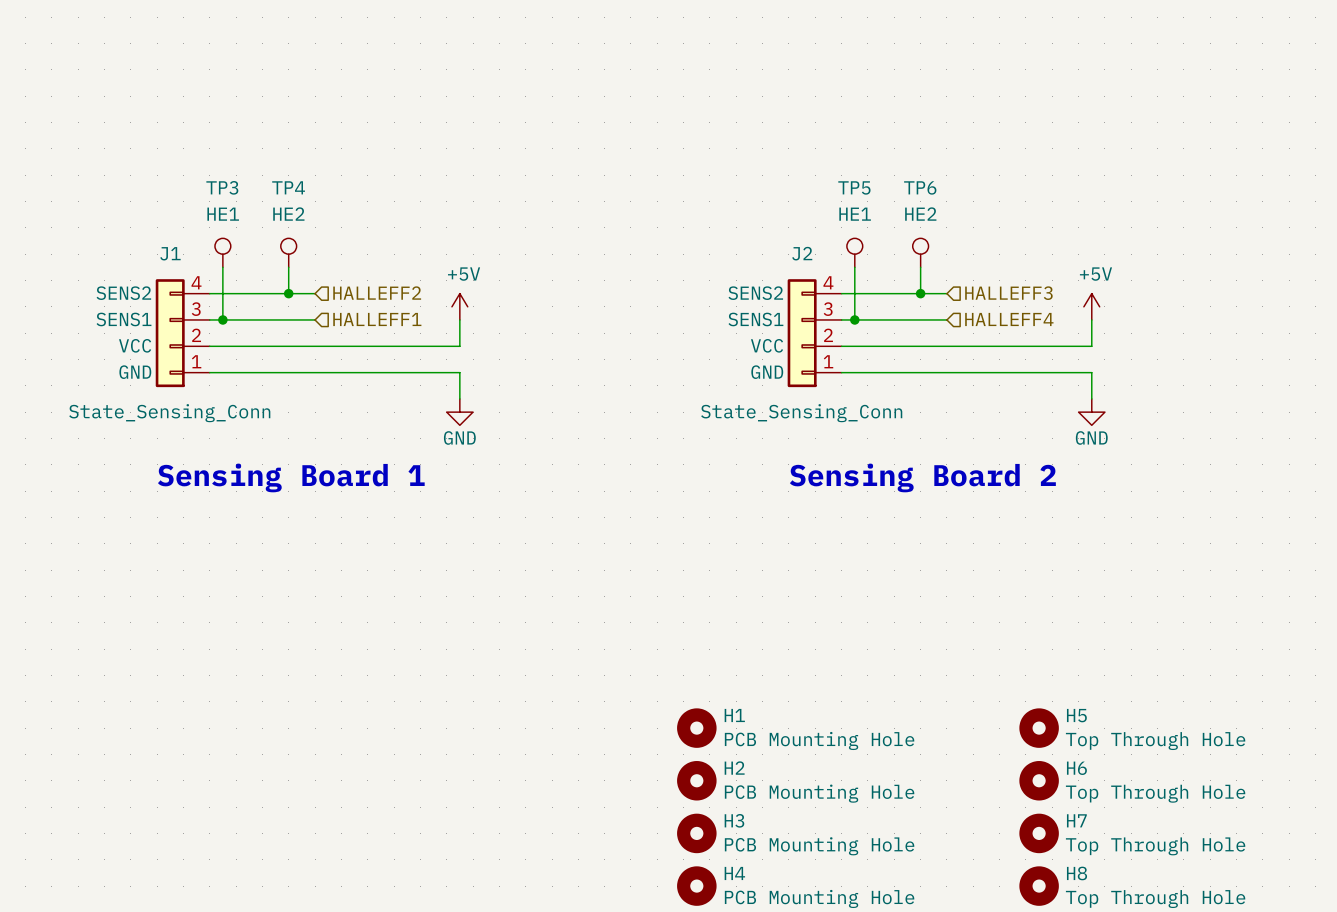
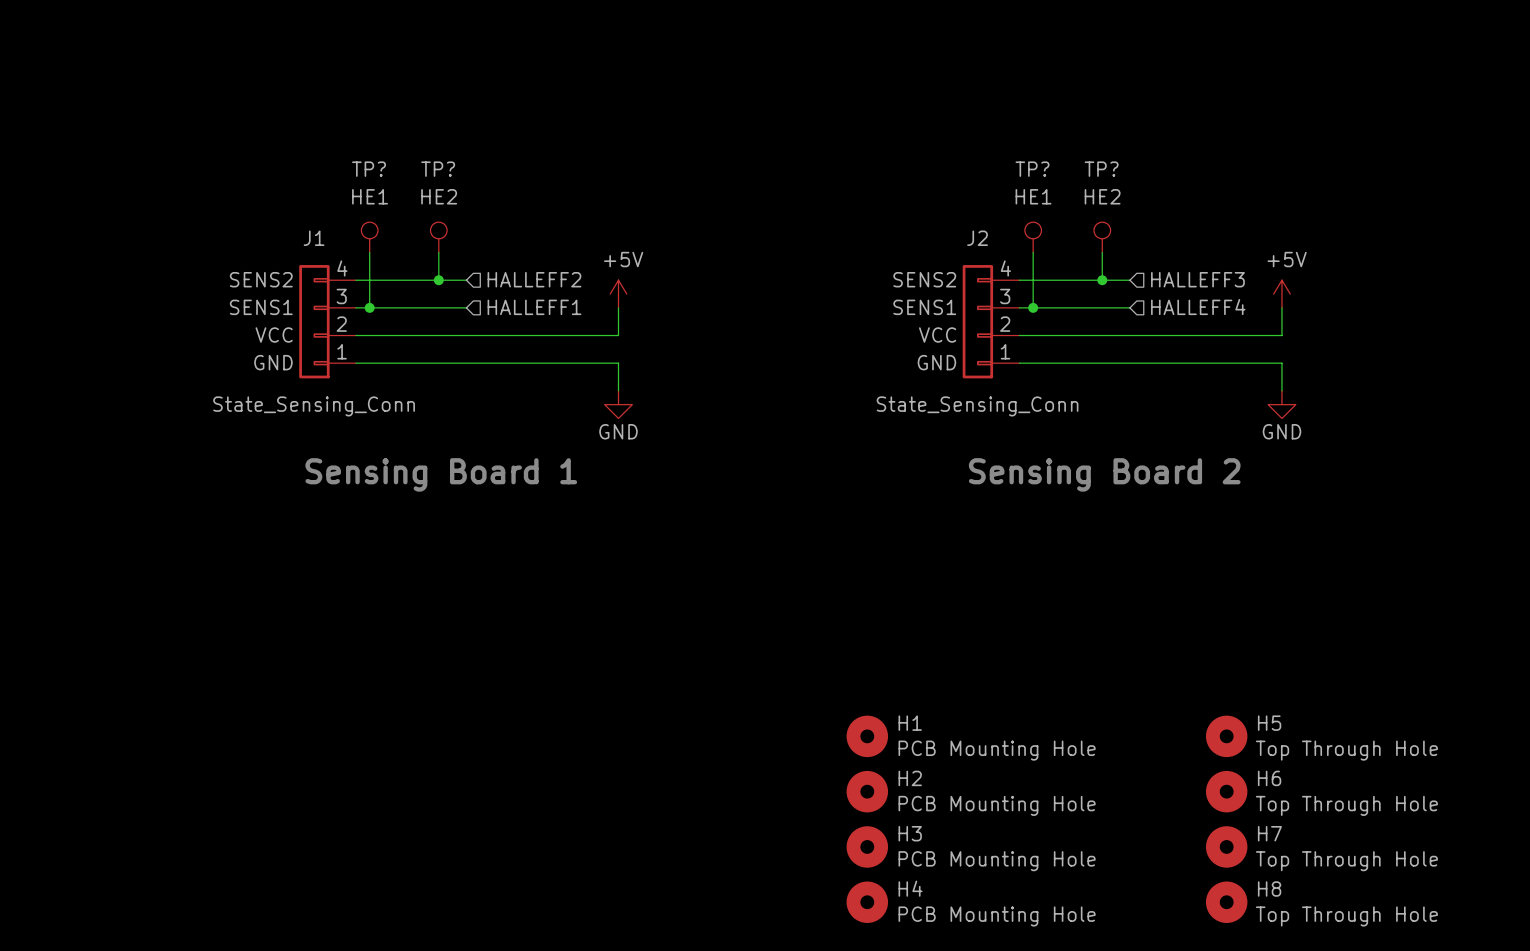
TP3 name: TP3 (222, 187) -> TP? (369, 169)
TP4 name: TP4 (288, 187) -> TP? (438, 169)
TP5 name: TP5 (854, 187) -> TP? (1032, 169)
TP6 name: TP6 (920, 187) -> TP? (1101, 169)

